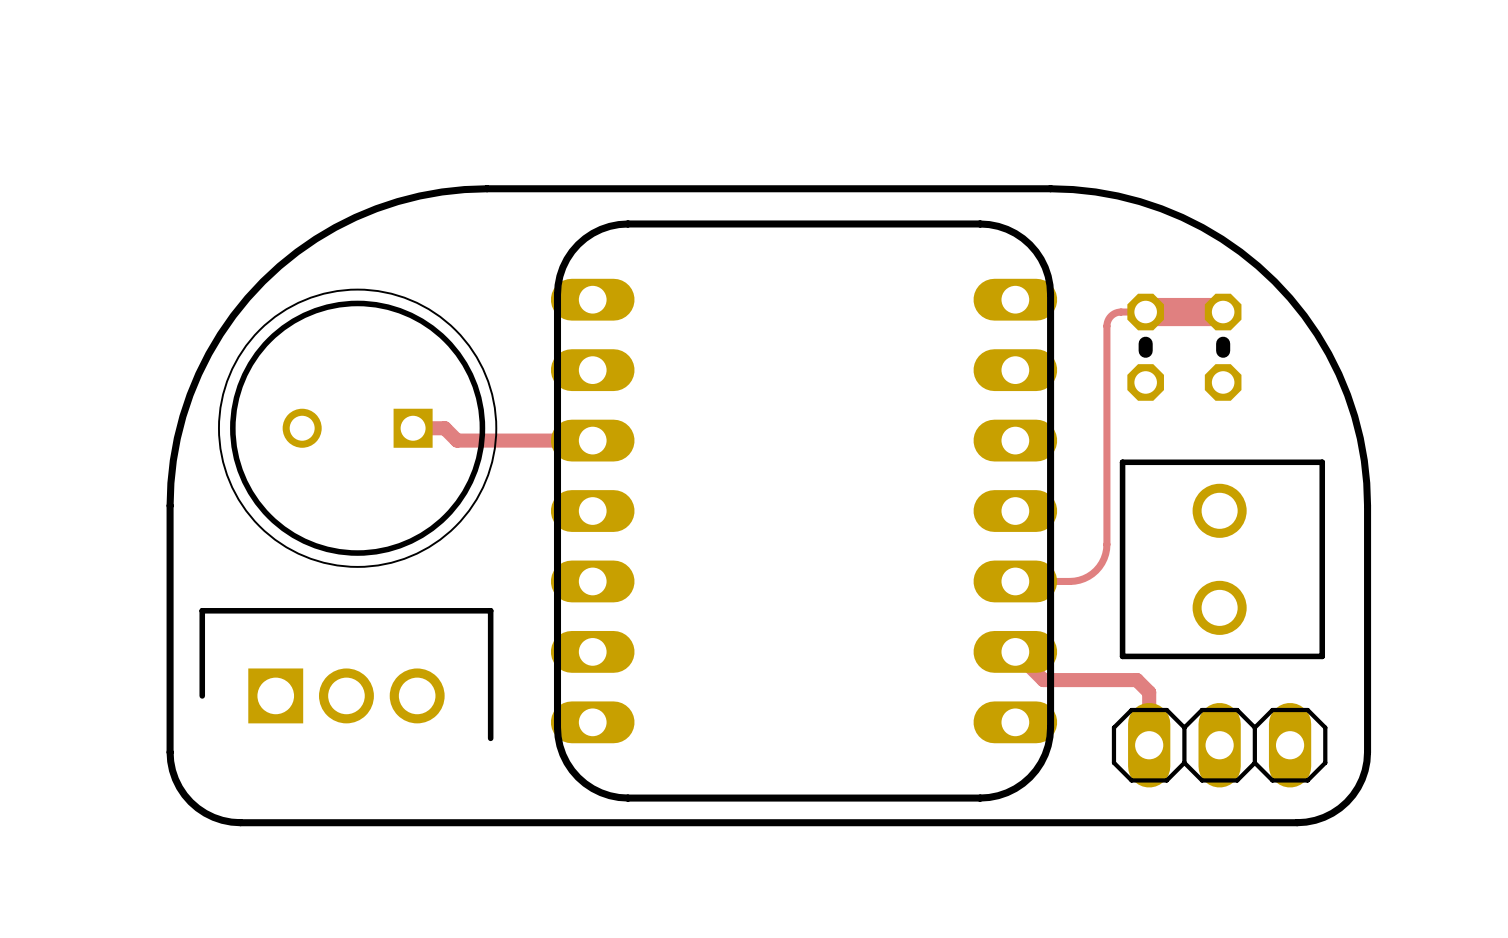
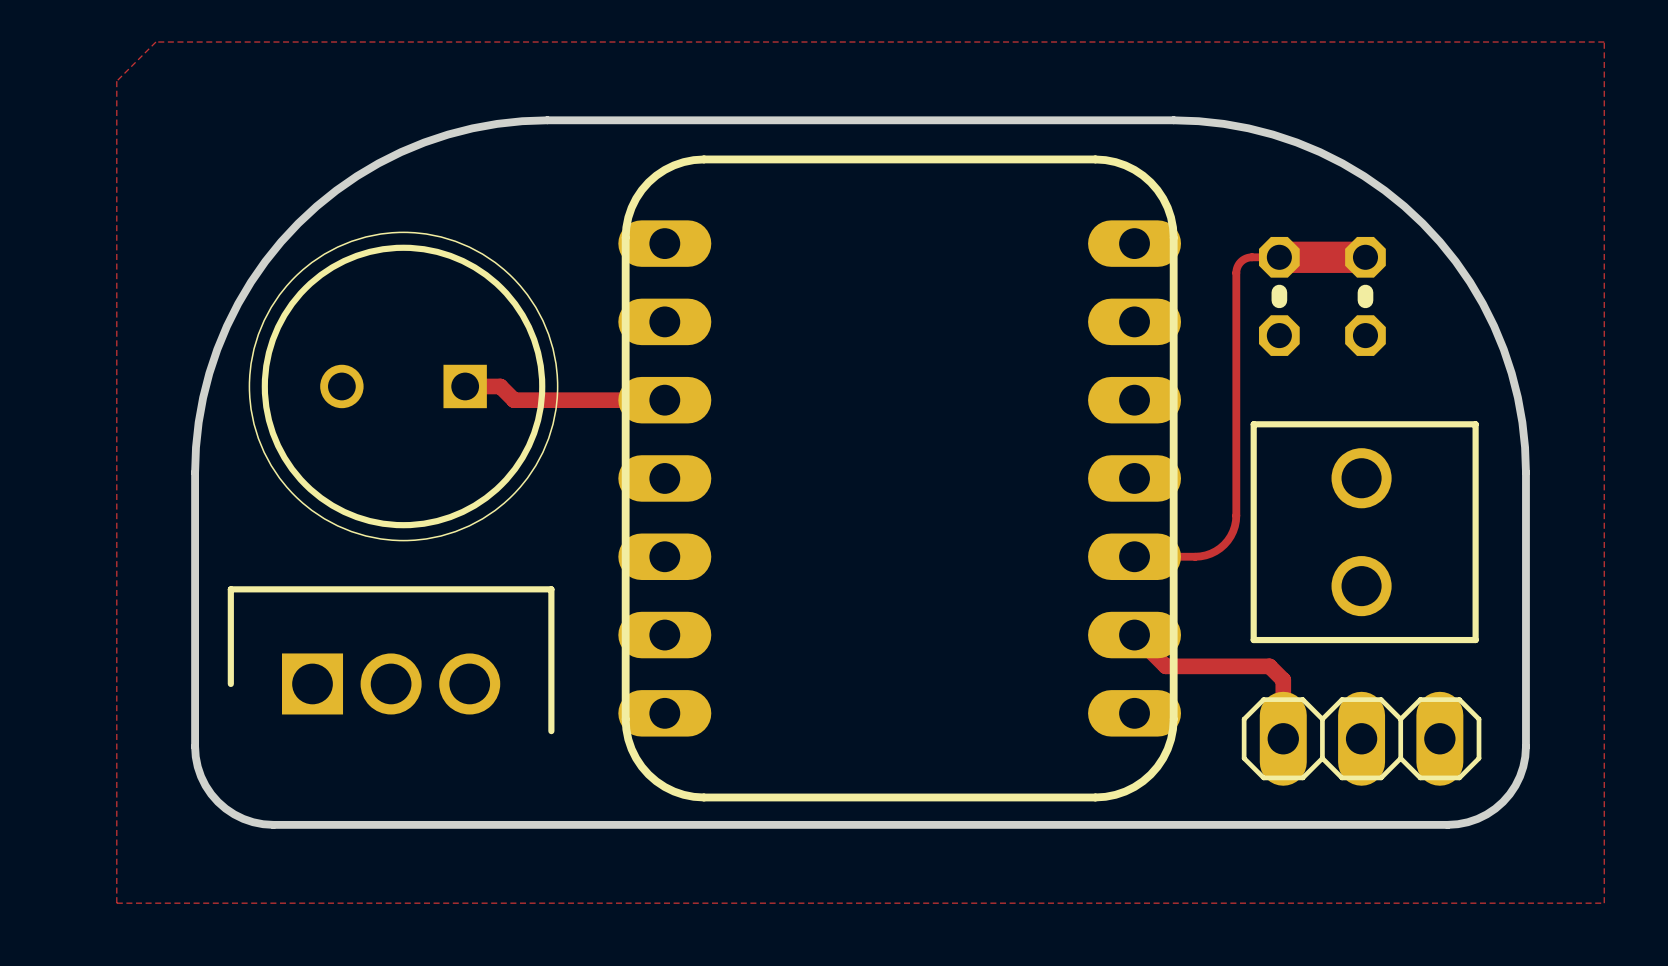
zone outline: none -> (155, 42) (1604, 42) (1604, 903) (116, 903) (116, 81) (155, 42)

